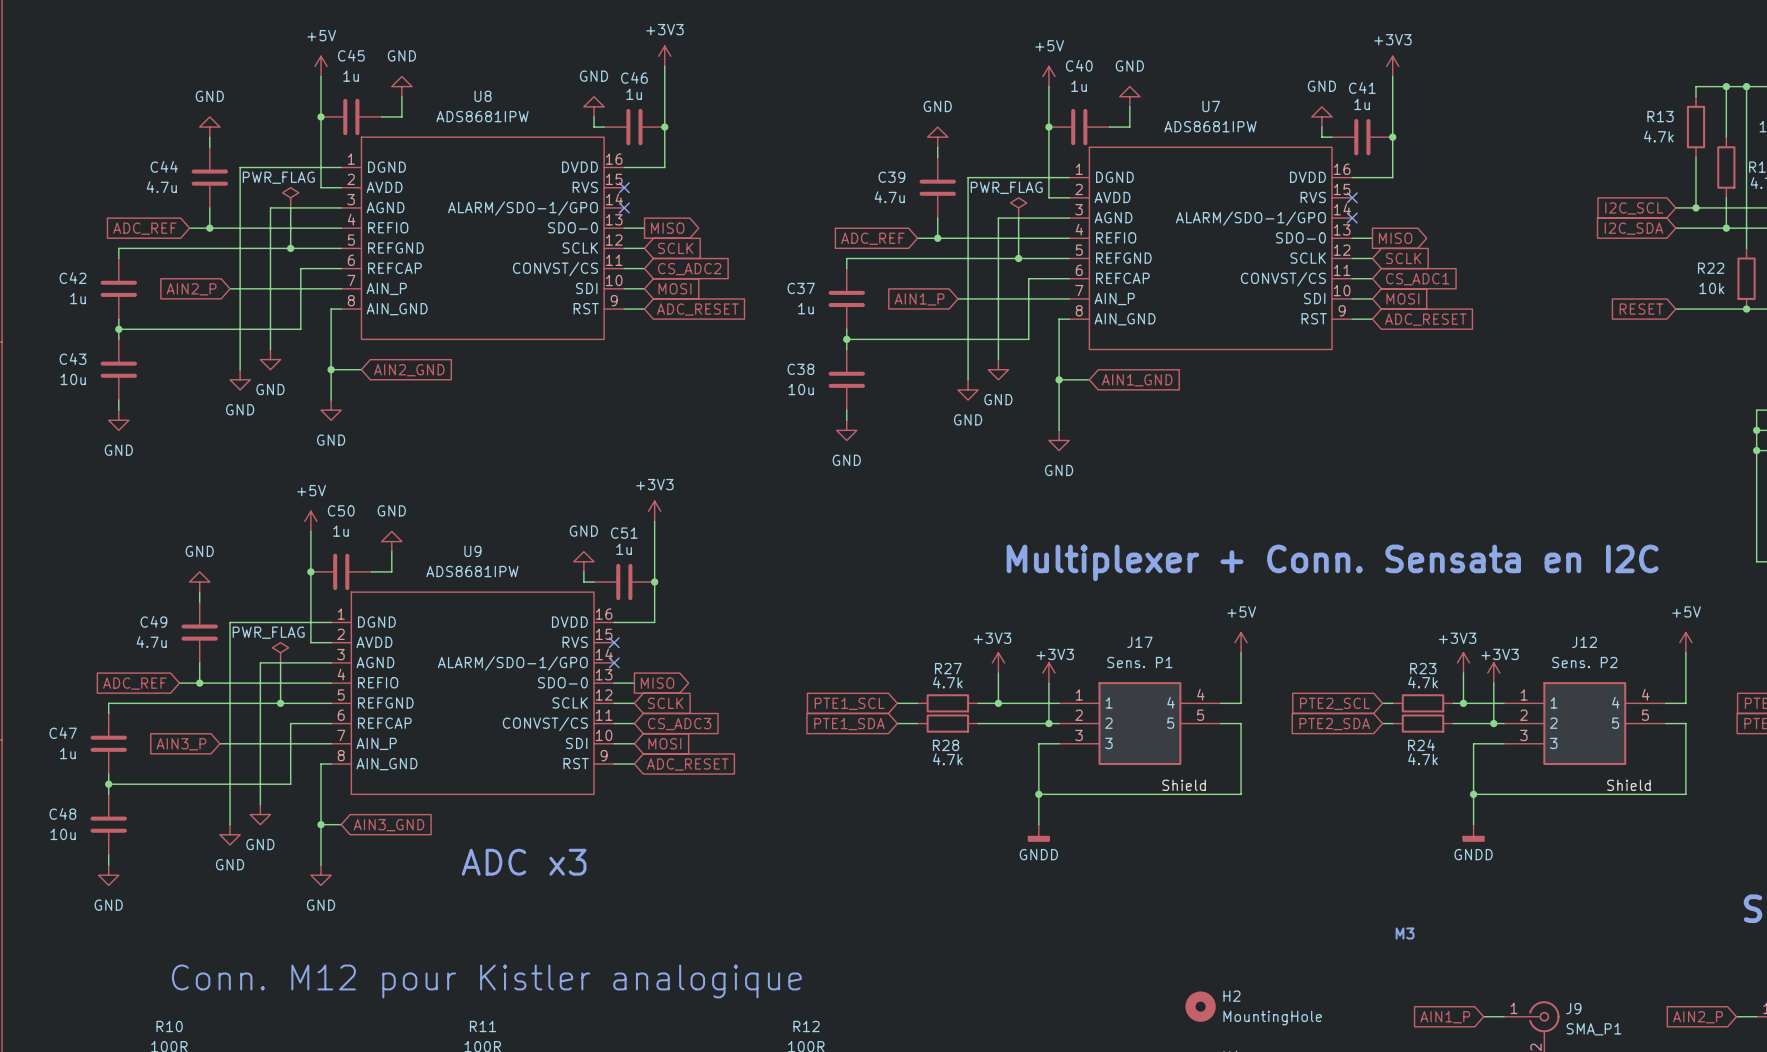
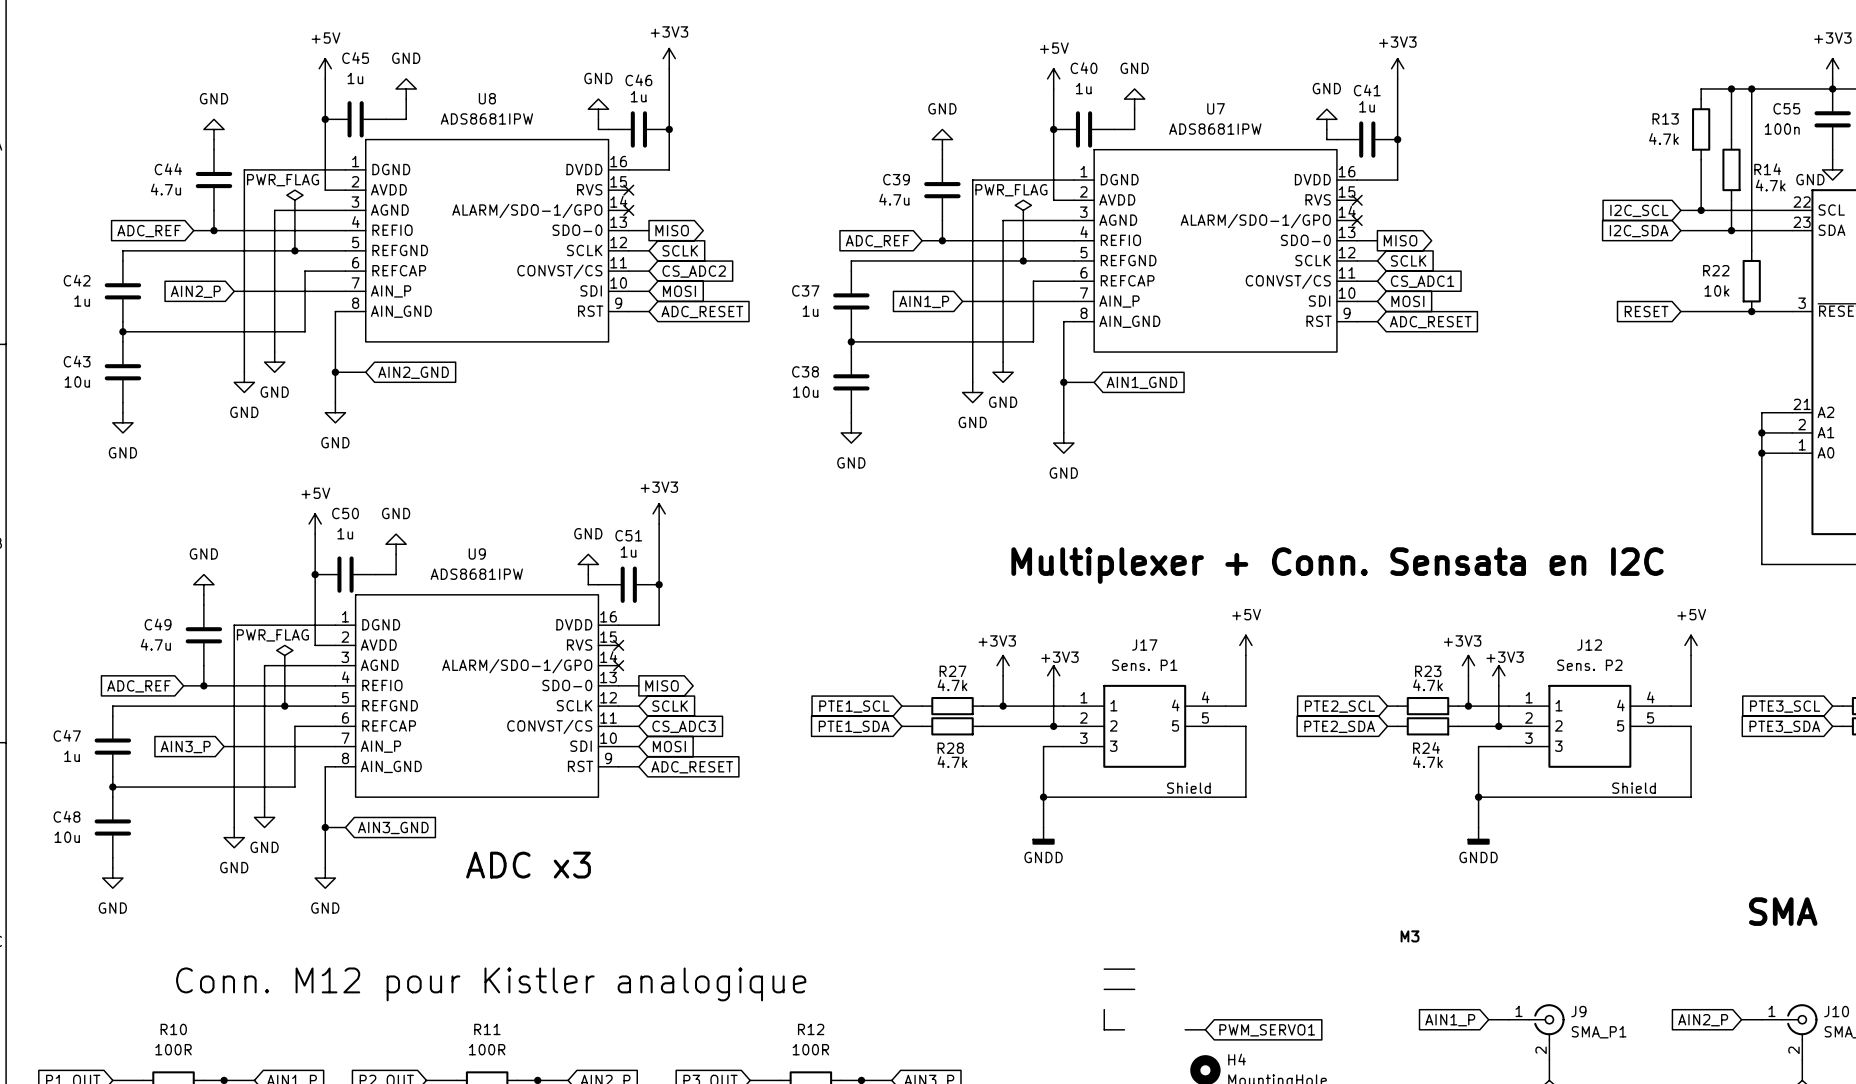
wire: none -> (1104, 969) (1134, 969)
wire: none -> (1104, 989) (1134, 989)
wire: none -> (1104, 1009) (1104, 1029) (1124, 1029)
H2: MountingHole (1200, 1006) -> none
wire: none -> (1185, 1029) (1205, 1029)
global label: none -> PWM_SERVO1 (1267, 1030)

